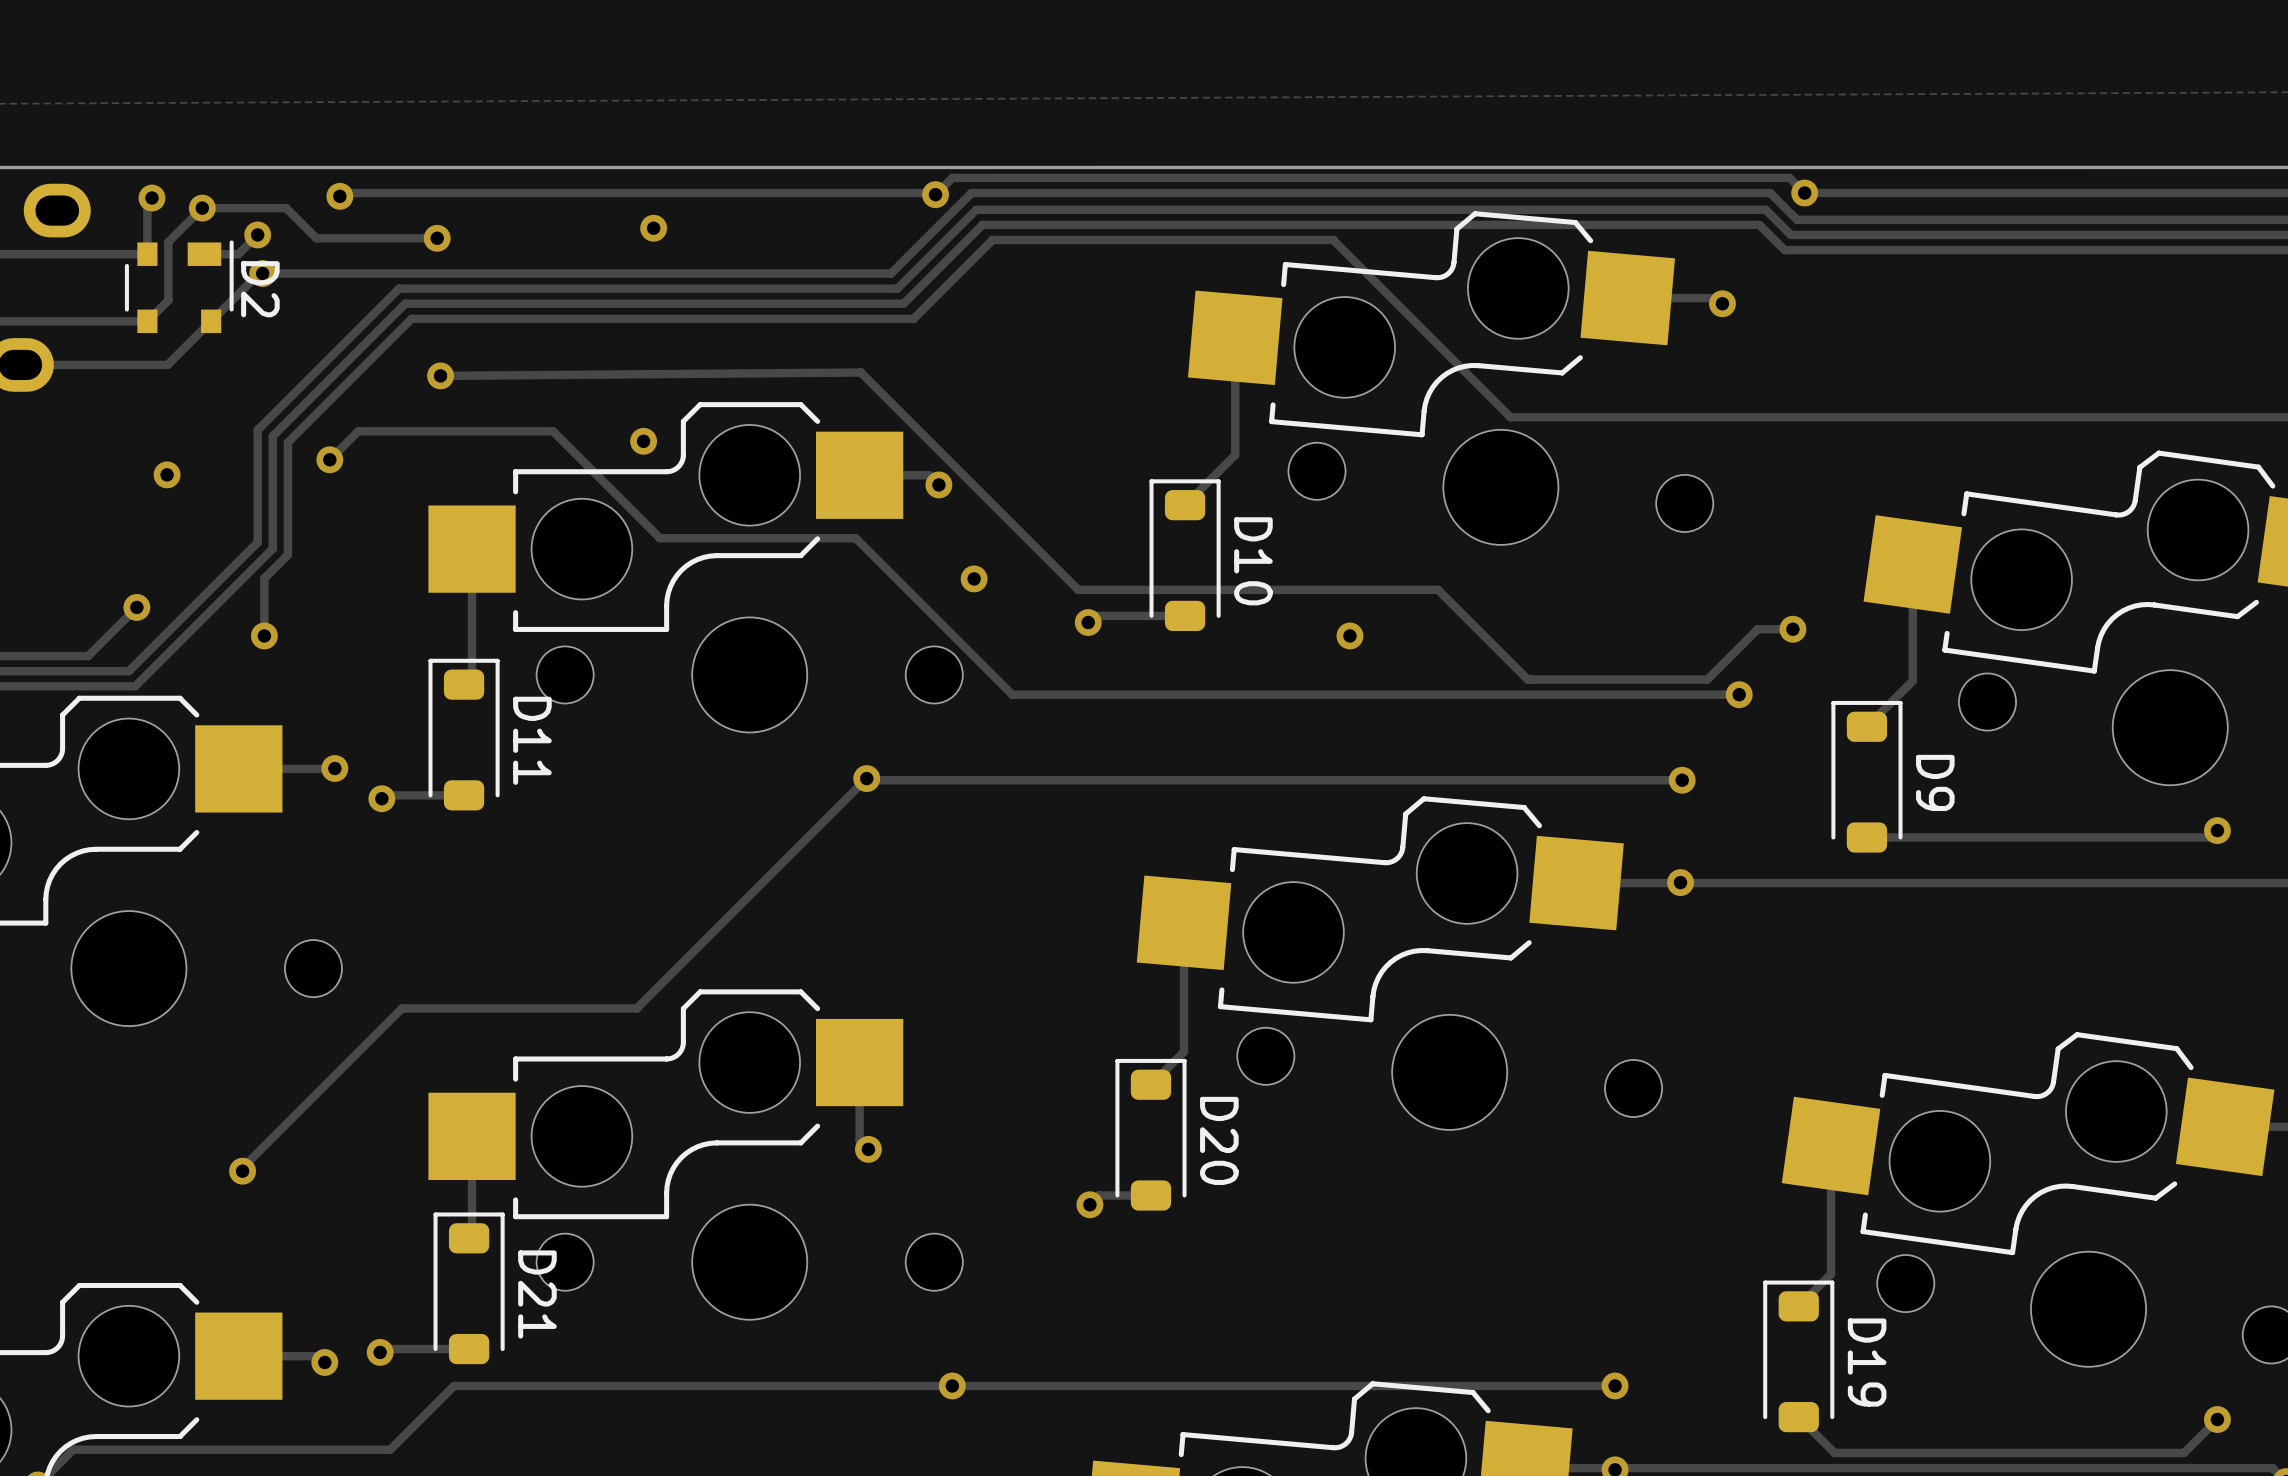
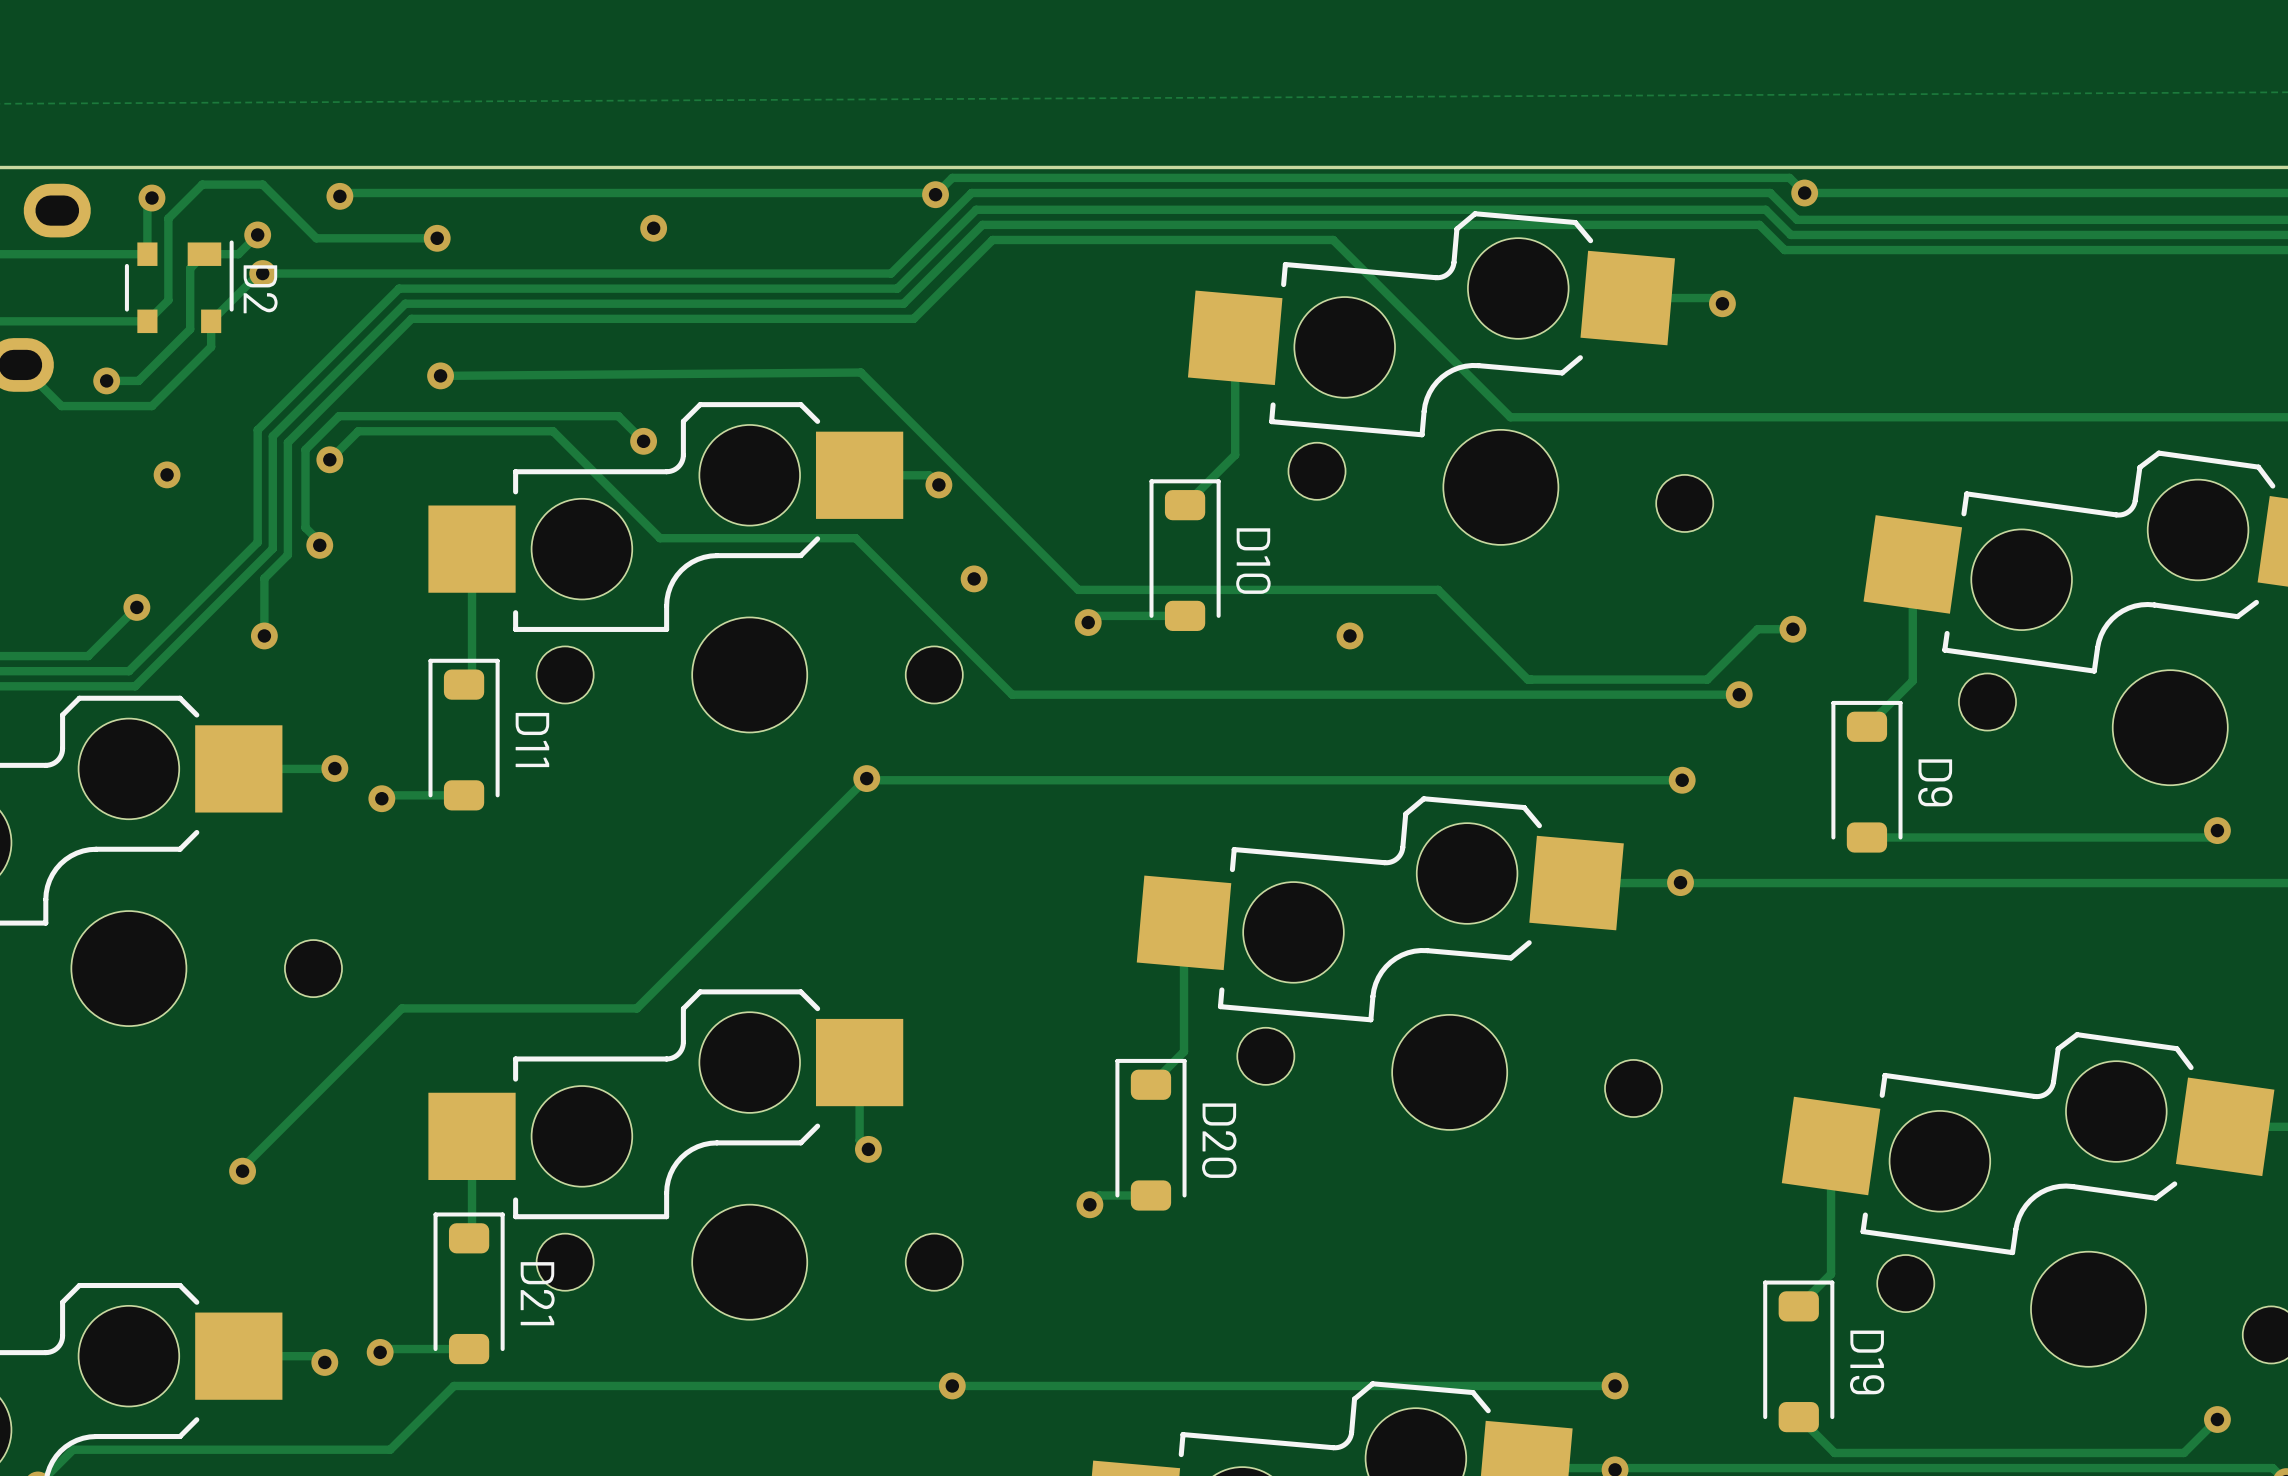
track: (202, 208) (168, 242) -> none
via: (202, 208) -> none
track: (286, 208) (202, 208) -> (286, 208) (262, 184) (202, 184) (168, 218) (168, 242)
track: none -> (204, 254) (190, 268) (190, 329) (138, 380) (106, 380) (104, 379)
track: (211, 321) (167, 364) (20, 364) -> (211, 321) (211, 346) (151, 406) (61, 406) (20, 364)
via: none -> (106, 380)
track: none -> (643, 441) (618, 416) (339, 416) (305, 449) (305, 527) (323, 545) (319, 545) (319, 541)
via: none -> (319, 545)

